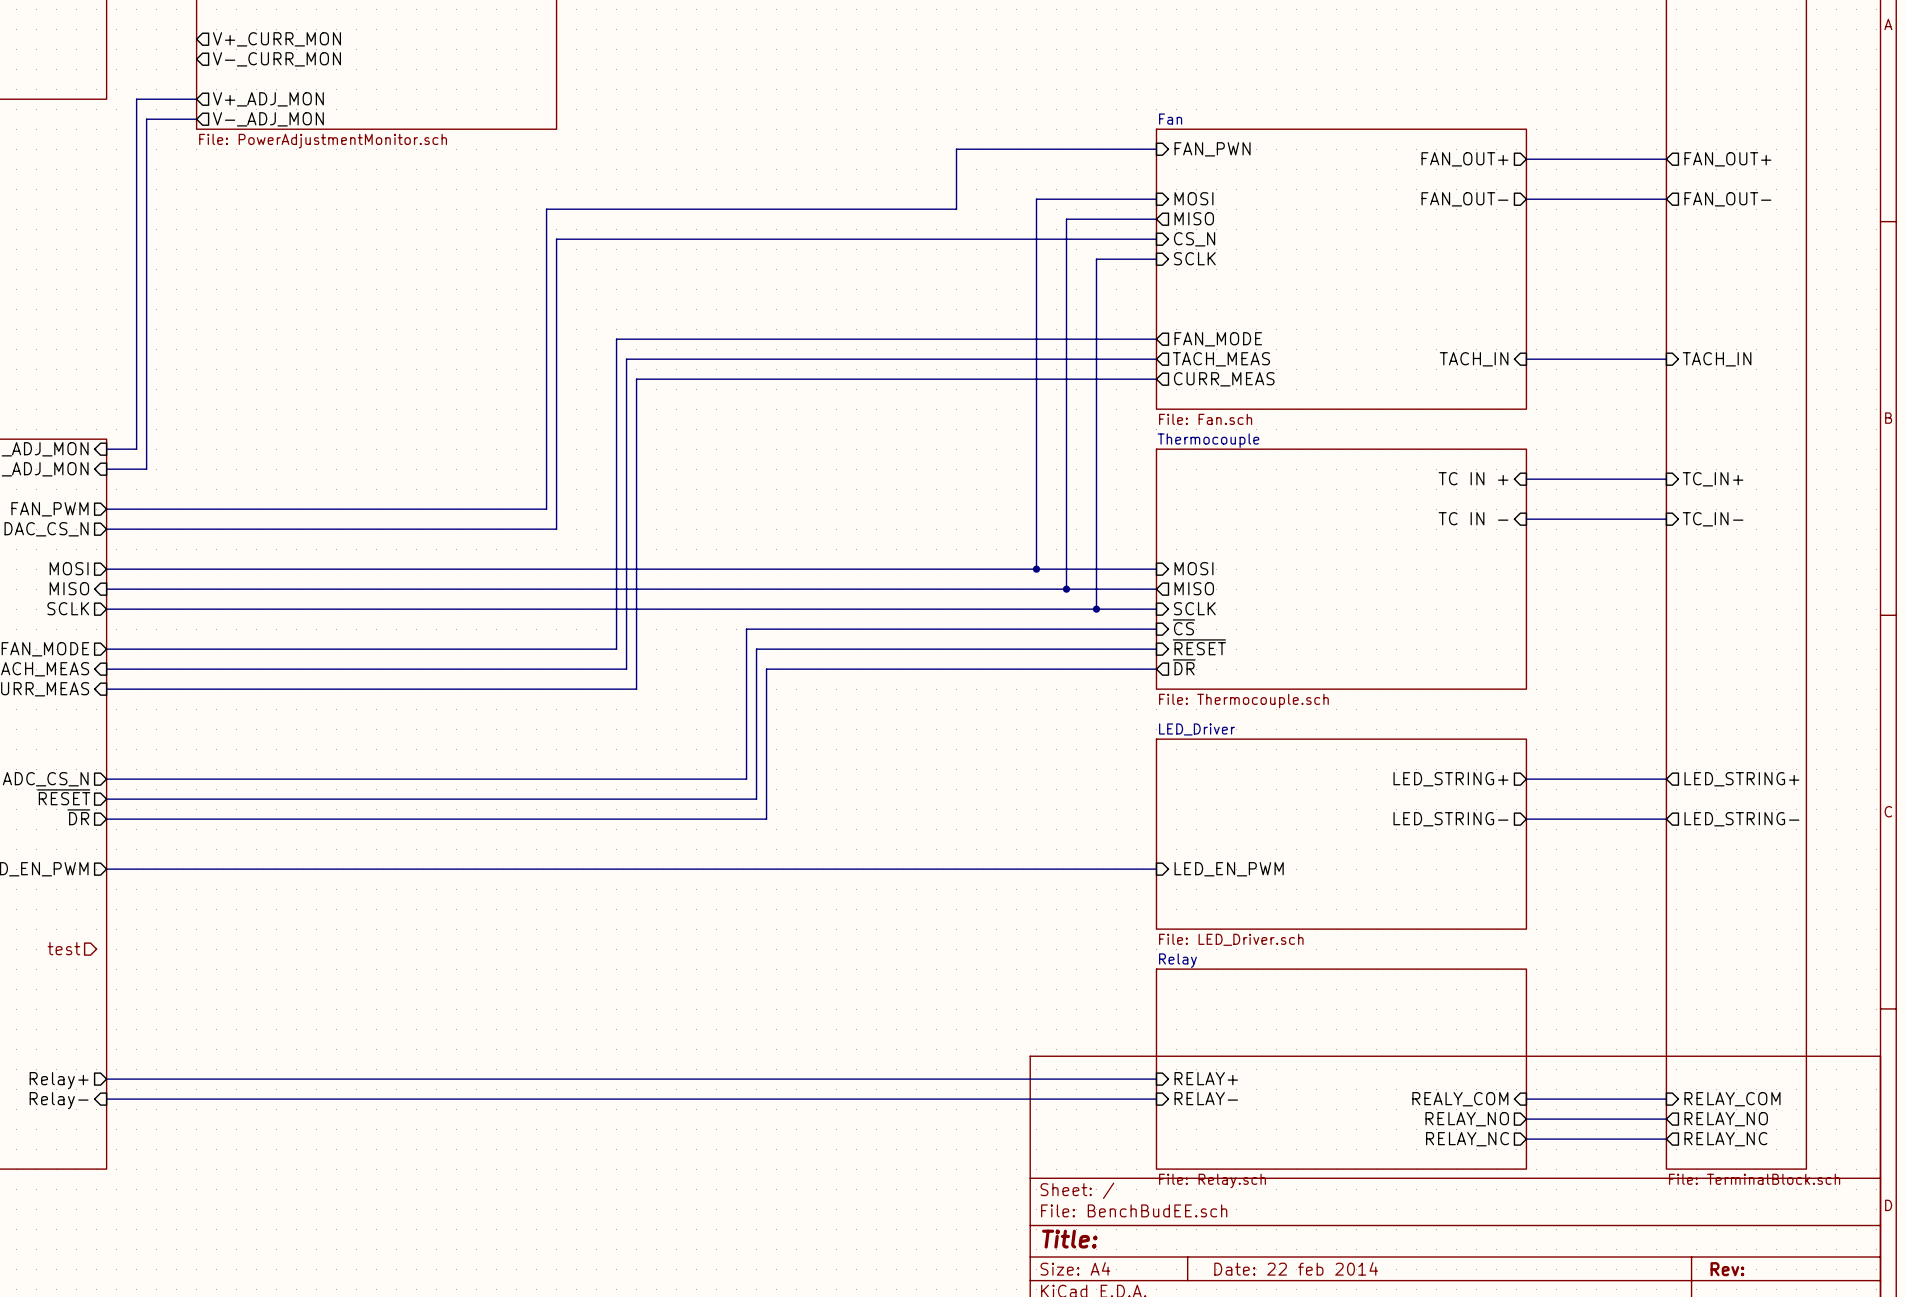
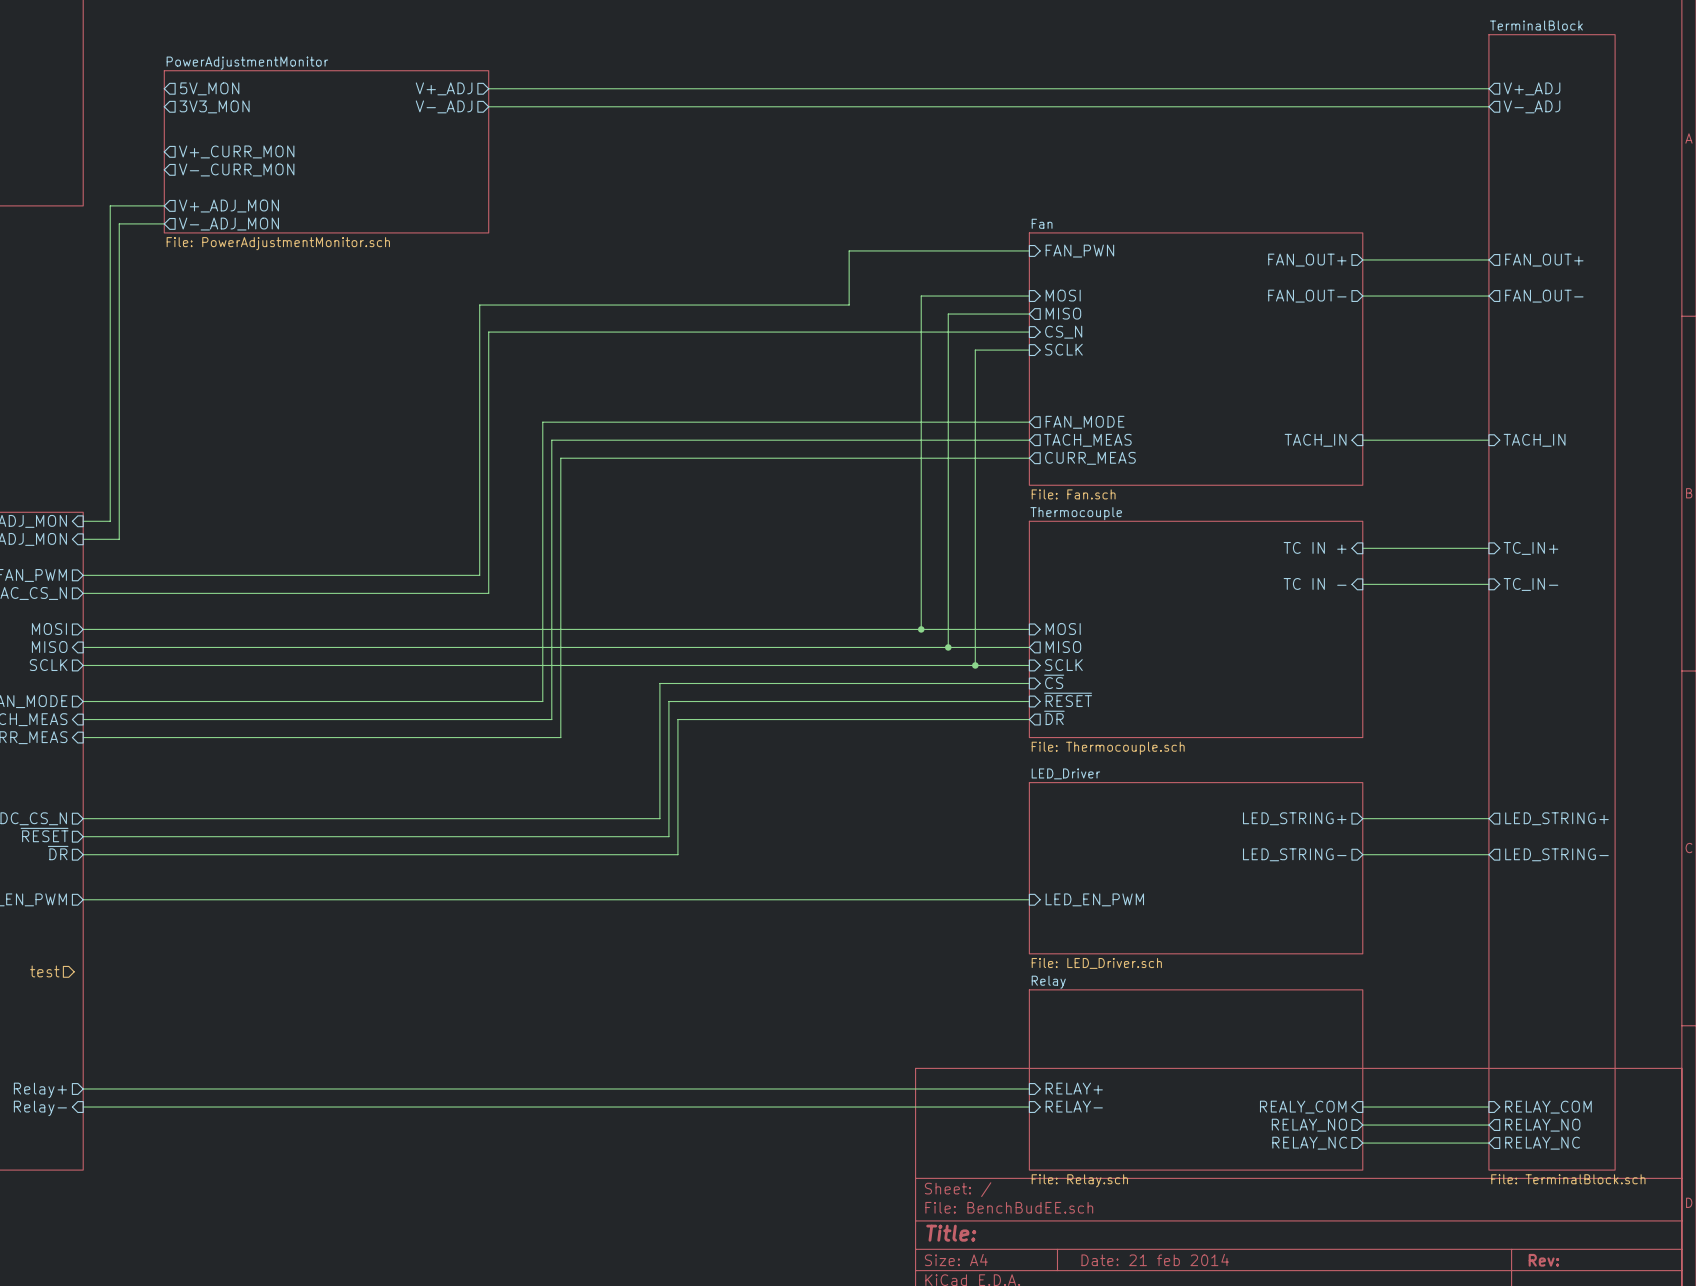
title block: Date: 22 feb 2014 (1296, 1268) -> Date: 21 feb 2014 (1155, 1260)

